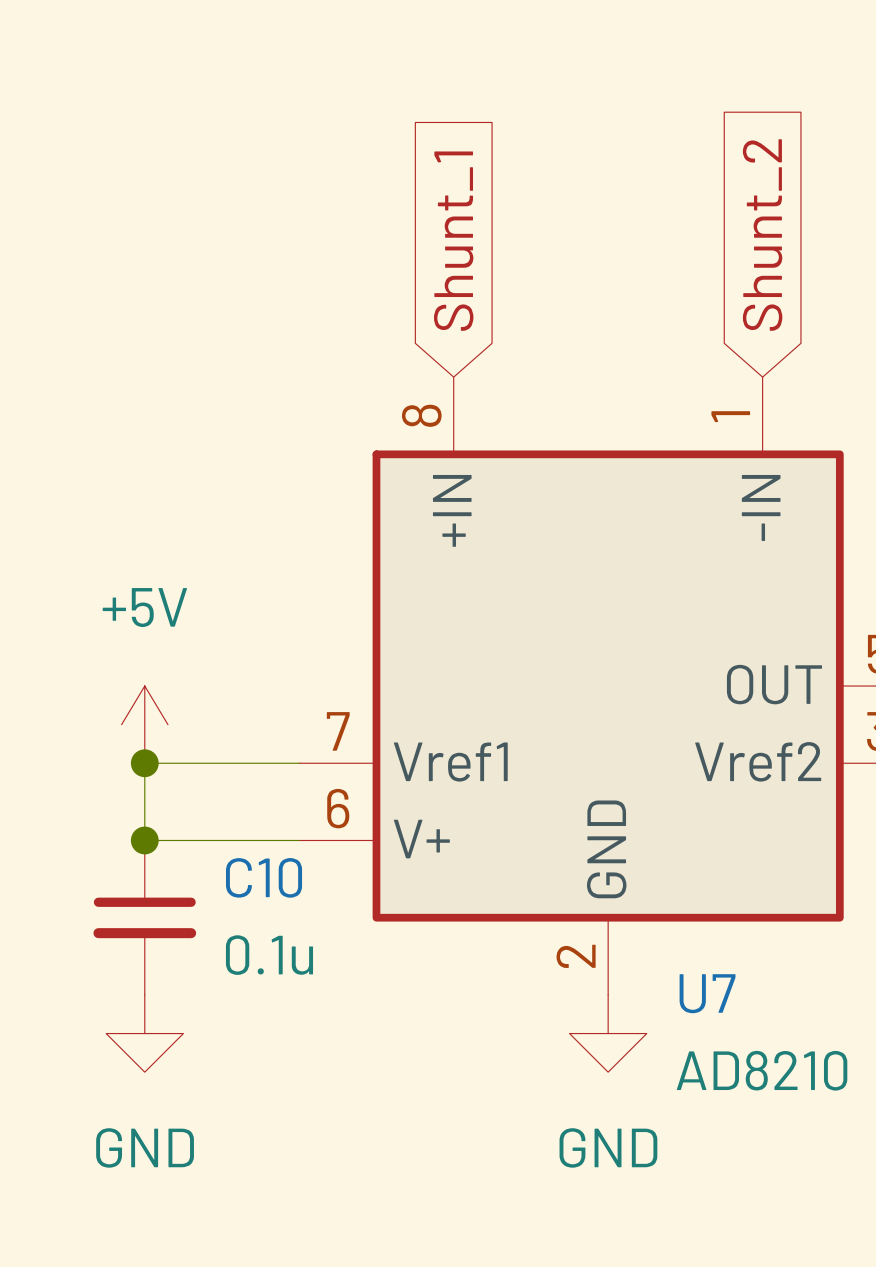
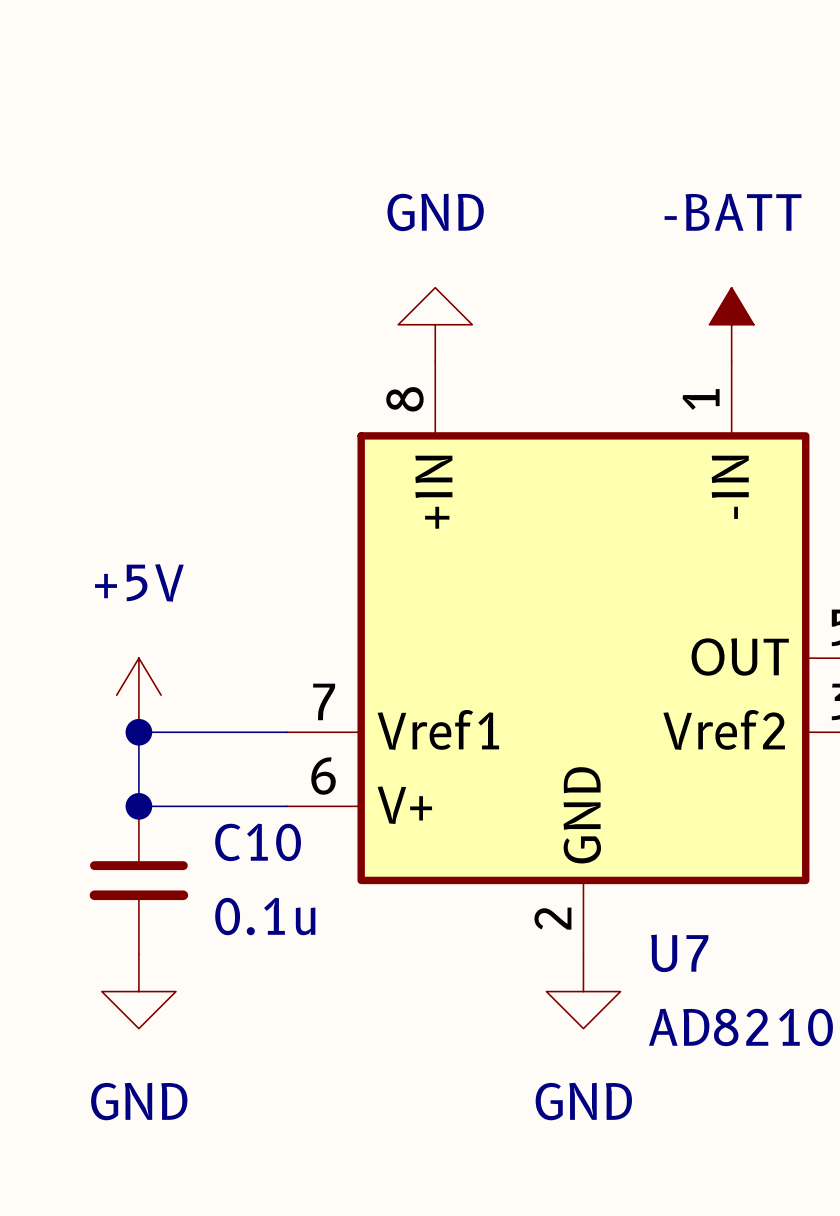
global label: Shunt_2 (762, 235) -> none
global label: Shunt_1 (453, 241) -> none
power symbol: none -> GND (435, 324)
power symbol: none -> -BATT (731, 324)

